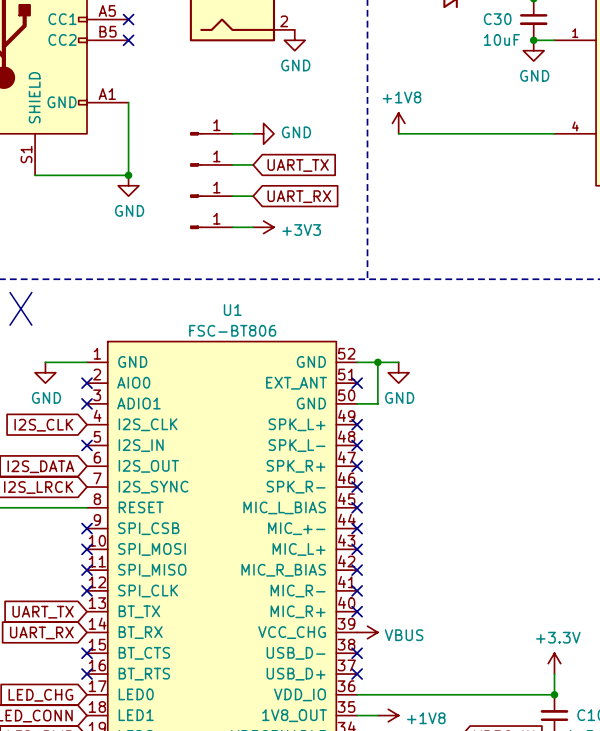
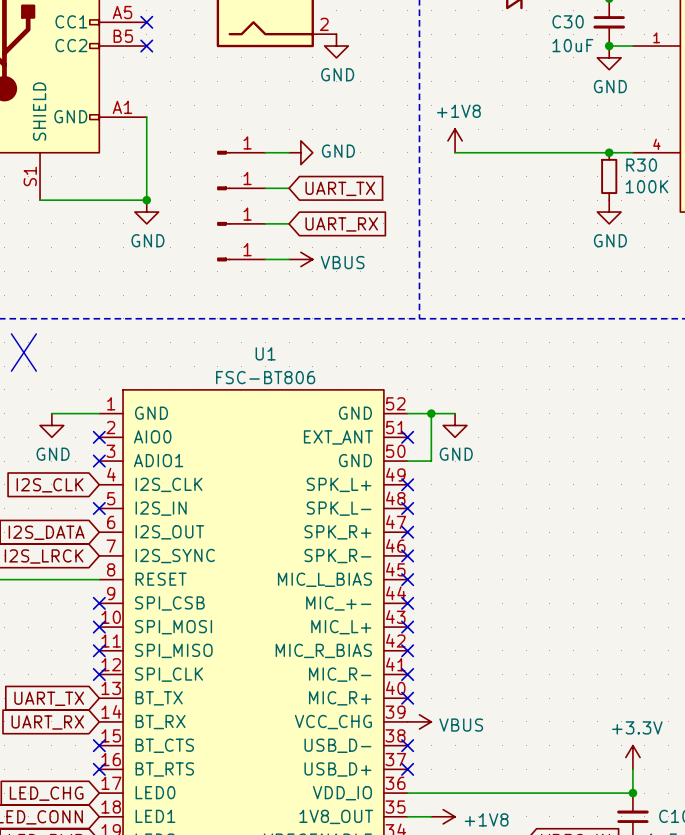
junction: none -> (609, 152)
R30: none -> 100K (609, 176)
power symbol: none -> GND (609, 212)
power symbol: +3V3 (263, 227) -> VBUS (300, 259)

